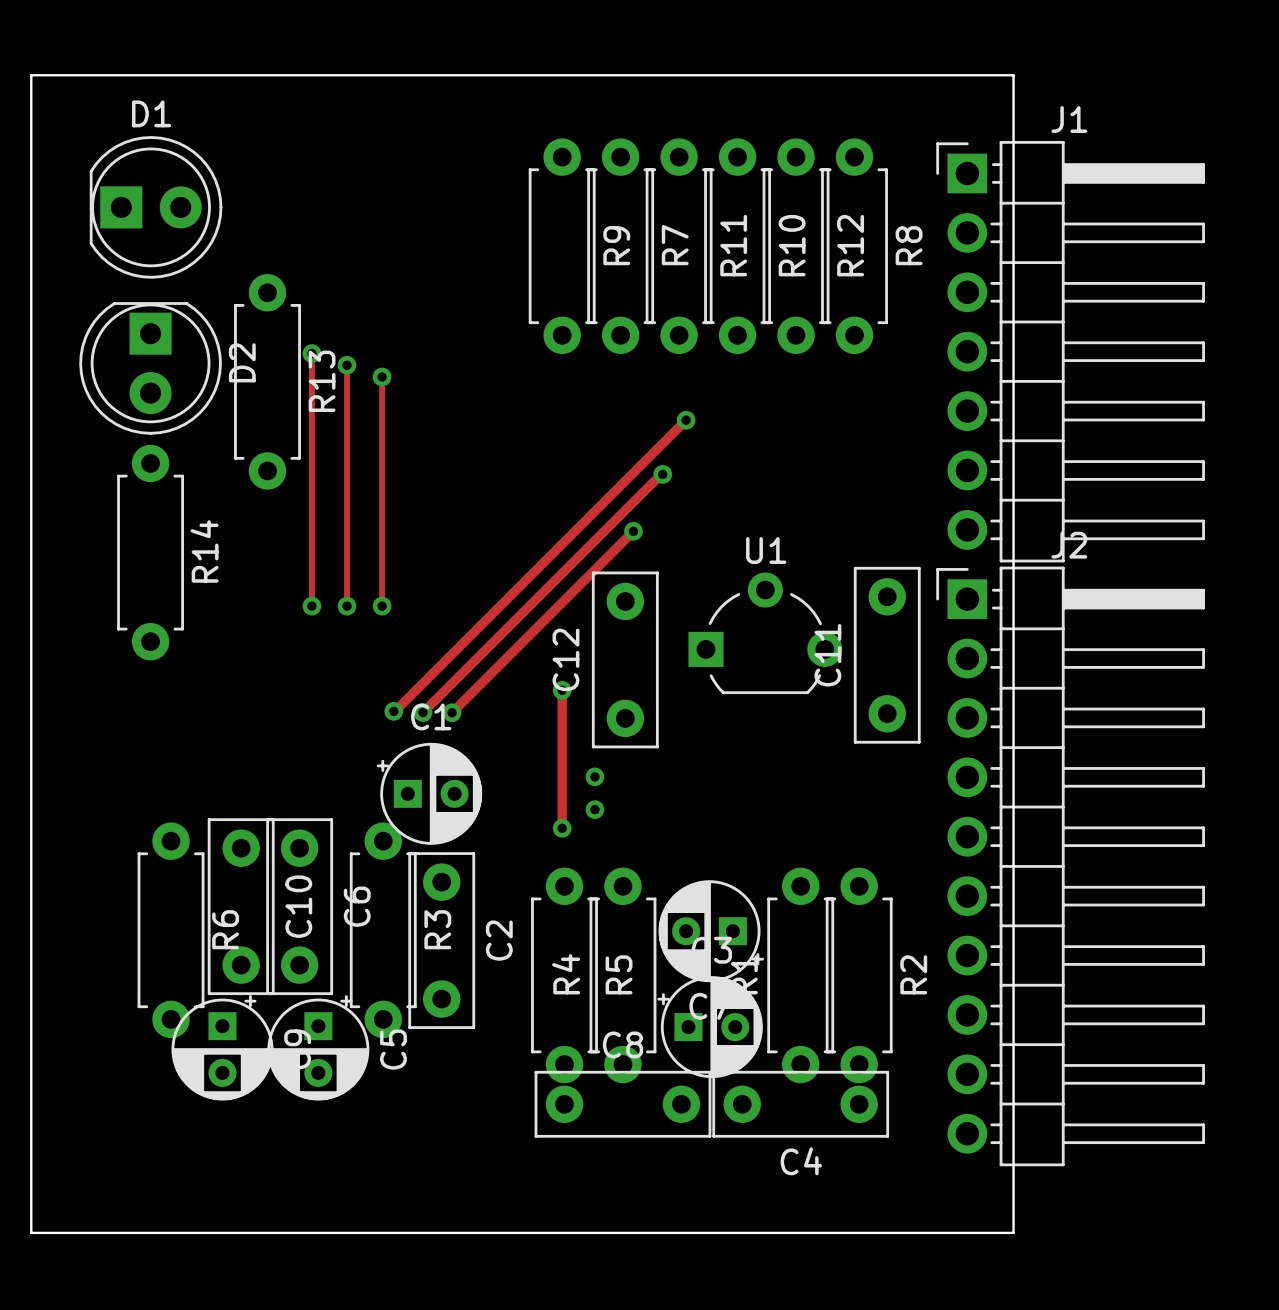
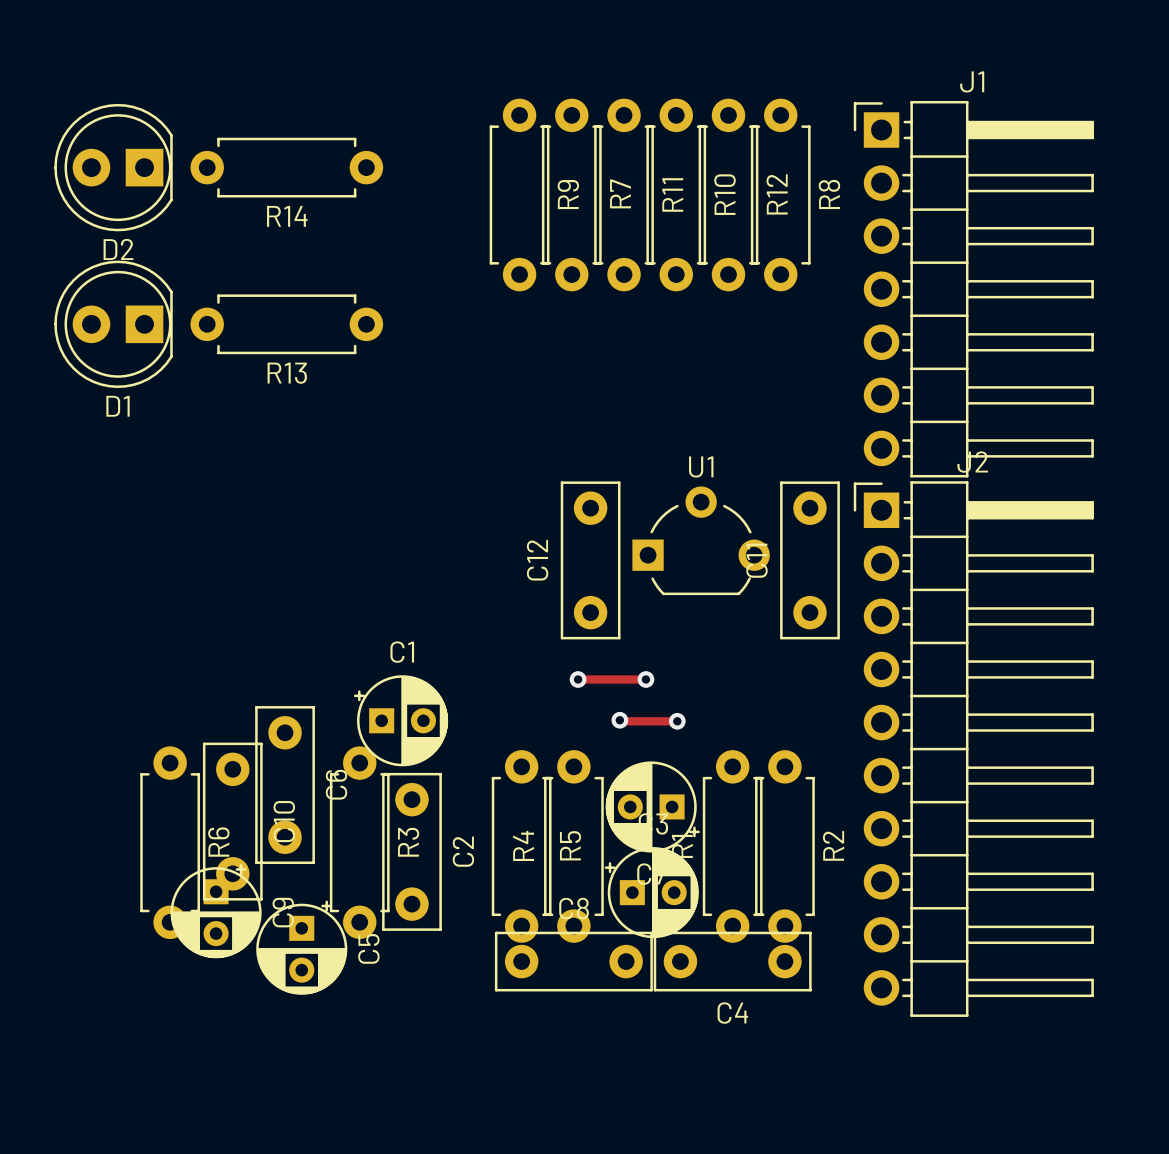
board edge: (31, 75) (1013, 75) (1013, 1232) (31, 1232) (31, 75) -> none
D1 rotation: 0° (156, 207) -> 180° (113, 324)
D1 position: (156, 207) -> (113, 324)
track: (311, 353) (311, 606) -> none
via: (311, 353) -> none
track: (347, 365) (347, 606) -> none
via: (347, 365) -> none
D2 rotation: 0° (150, 368) -> 90° clockwise (113, 167)
D2 position: (150, 368) -> (113, 167)
track: (382, 376) (382, 606) -> none
via: (382, 376) -> none
R13 rotation: 0° (267, 381) -> 90° clockwise (286, 324)
track: (686, 420) (393, 711) -> none
via: (686, 420) -> none
track: (662, 474) (423, 712) -> none
via: (662, 474) -> none
track: (633, 531) (452, 712) -> none
via: (633, 531) -> none
R14 rotation: 0° (150, 552) -> 90° clockwise (286, 167)
R14 position: (150, 552) -> (286, 167)
via: (311, 606) -> none
via: (347, 606) -> none
via: (382, 606) -> none
C12 position: (625, 659) -> (590, 560)
track: (562, 690) (562, 828) -> none
via: (562, 690) -> none
via: (393, 711) -> none
via: (423, 712) -> none
via: (452, 712) -> none
via: (594, 776) -> none
track: none -> (578, 679) (645, 679)
via: none -> (578, 679)
via: none -> (645, 679)
C1 position: (429, 793) -> (401, 720)
via: (594, 809) -> none
via: (562, 828) -> none
track: none -> (619, 720) (677, 721)
via: none -> (619, 720)
via: none -> (677, 721)
C10 position: (241, 906) -> (232, 821)
R6 position: (171, 930) -> (170, 842)
R3 position: (383, 930) -> (359, 842)
C2 position: (441, 940) -> (411, 851)
C5 position: (318, 1047) -> (301, 947)

